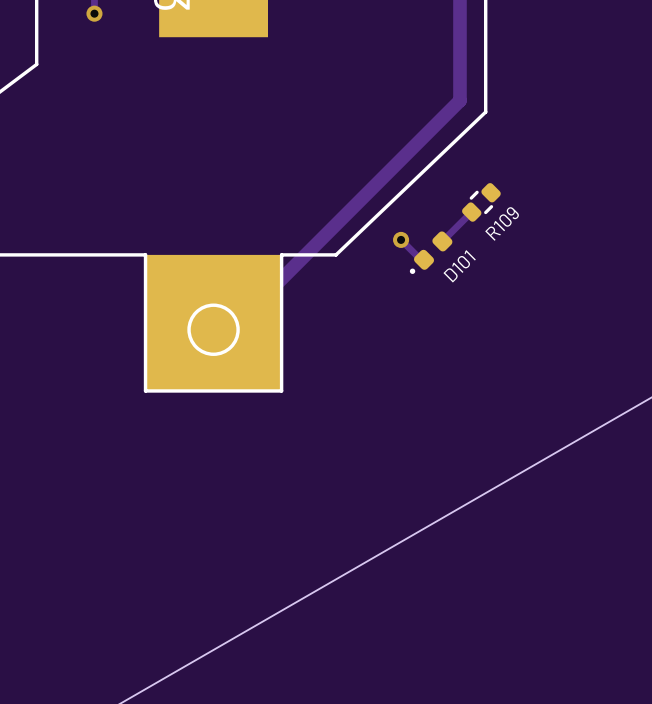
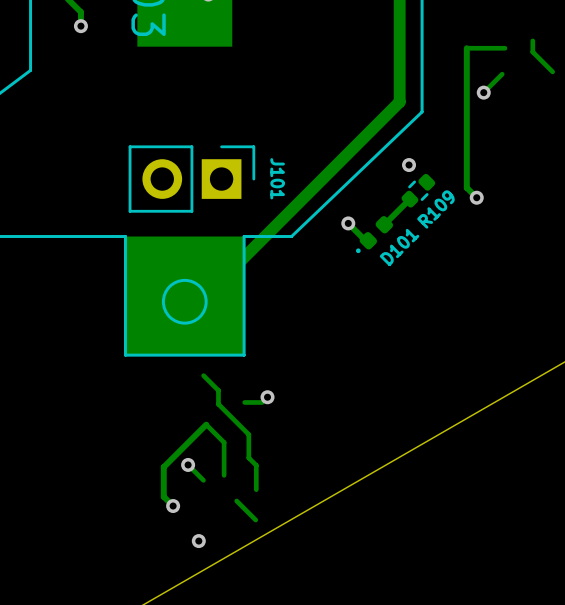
track: none -> (532, 40) (532, 52) (552, 71)
track: none -> (505, 48) (466, 48) (466, 187) (476, 197)
track: none -> (502, 74) (483, 92)
via: none -> (483, 92)
via: none -> (409, 165)
J101: none -> (191, 179)
via: none -> (476, 197)
track: none -> (203, 375) (218, 390) (218, 404) (248, 434) (248, 457) (256, 465) (256, 489)
via: none -> (267, 397)
track: none -> (262, 402) (244, 402)
track: none -> (188, 464) (203, 480)
via: none -> (188, 464)
track: none -> (224, 475) (224, 442) (206, 424) (163, 467) (163, 496) (173, 506)
track: none -> (236, 500) (255, 520)
via: none -> (173, 506)
via: none -> (198, 541)

